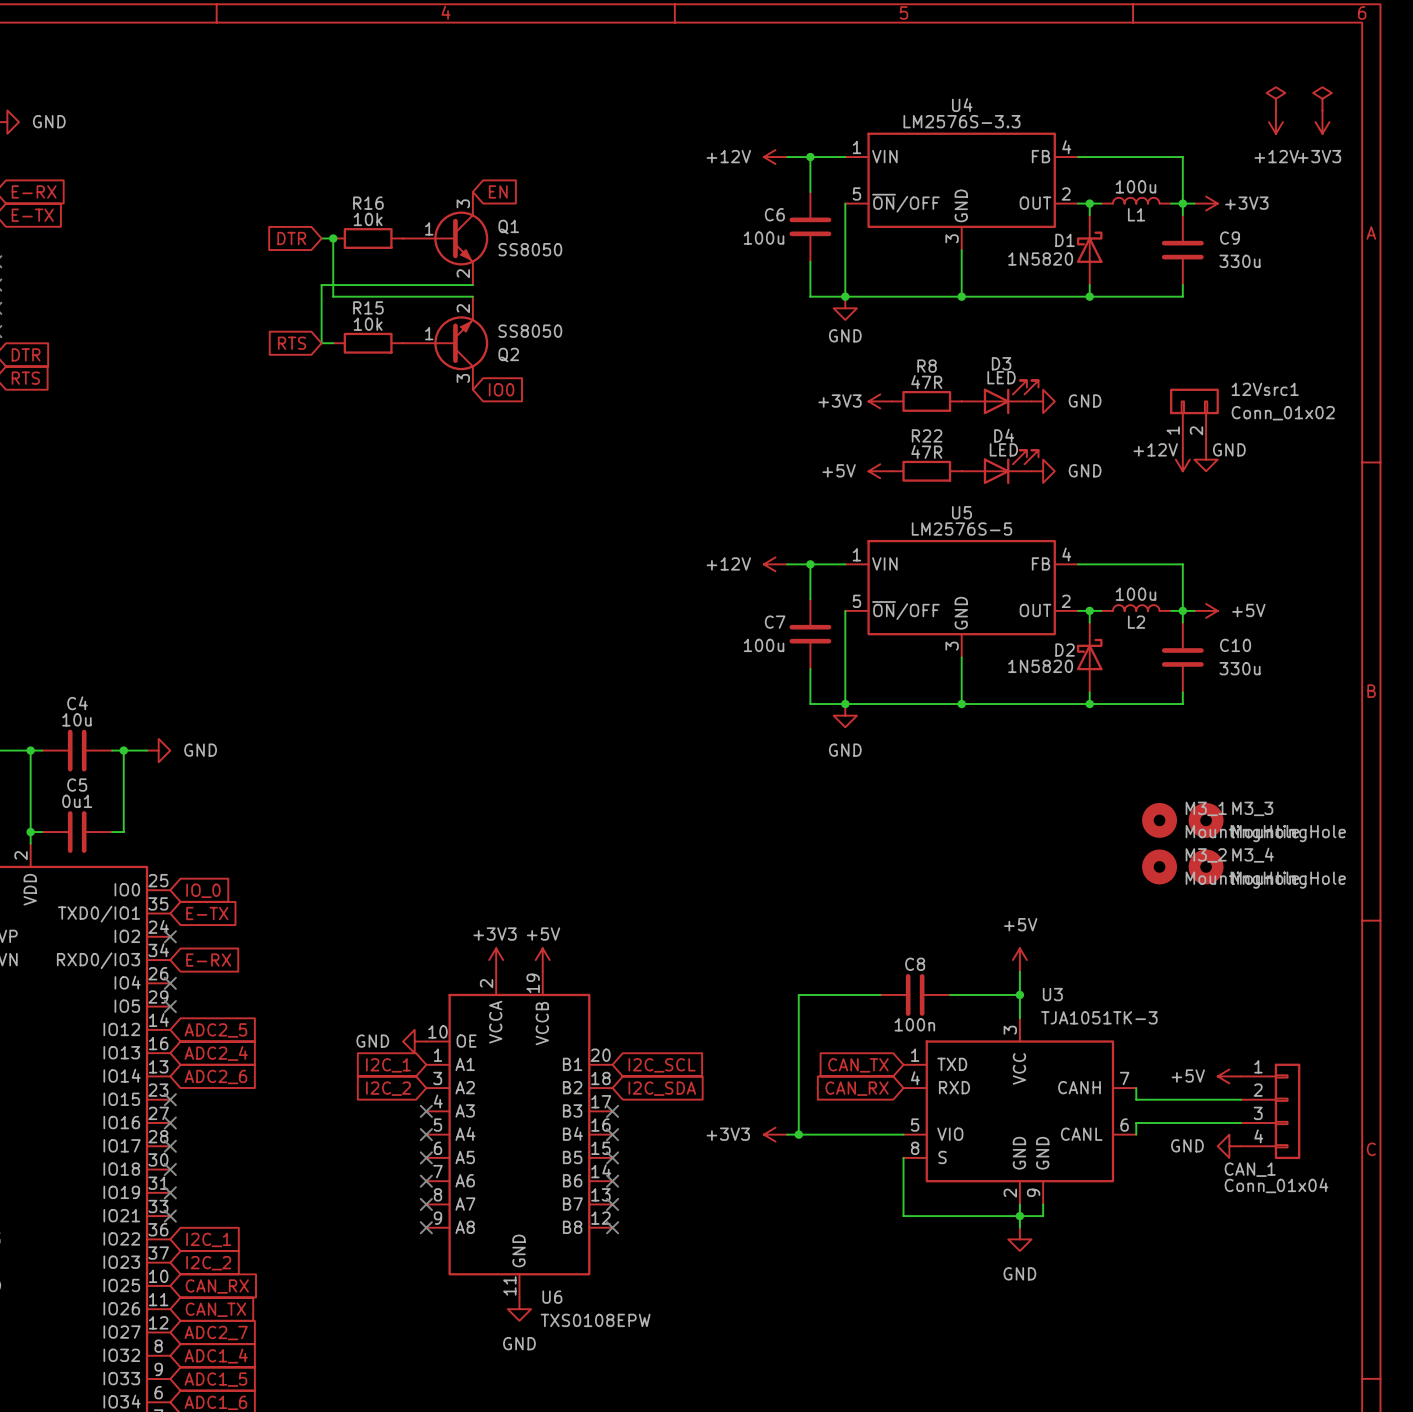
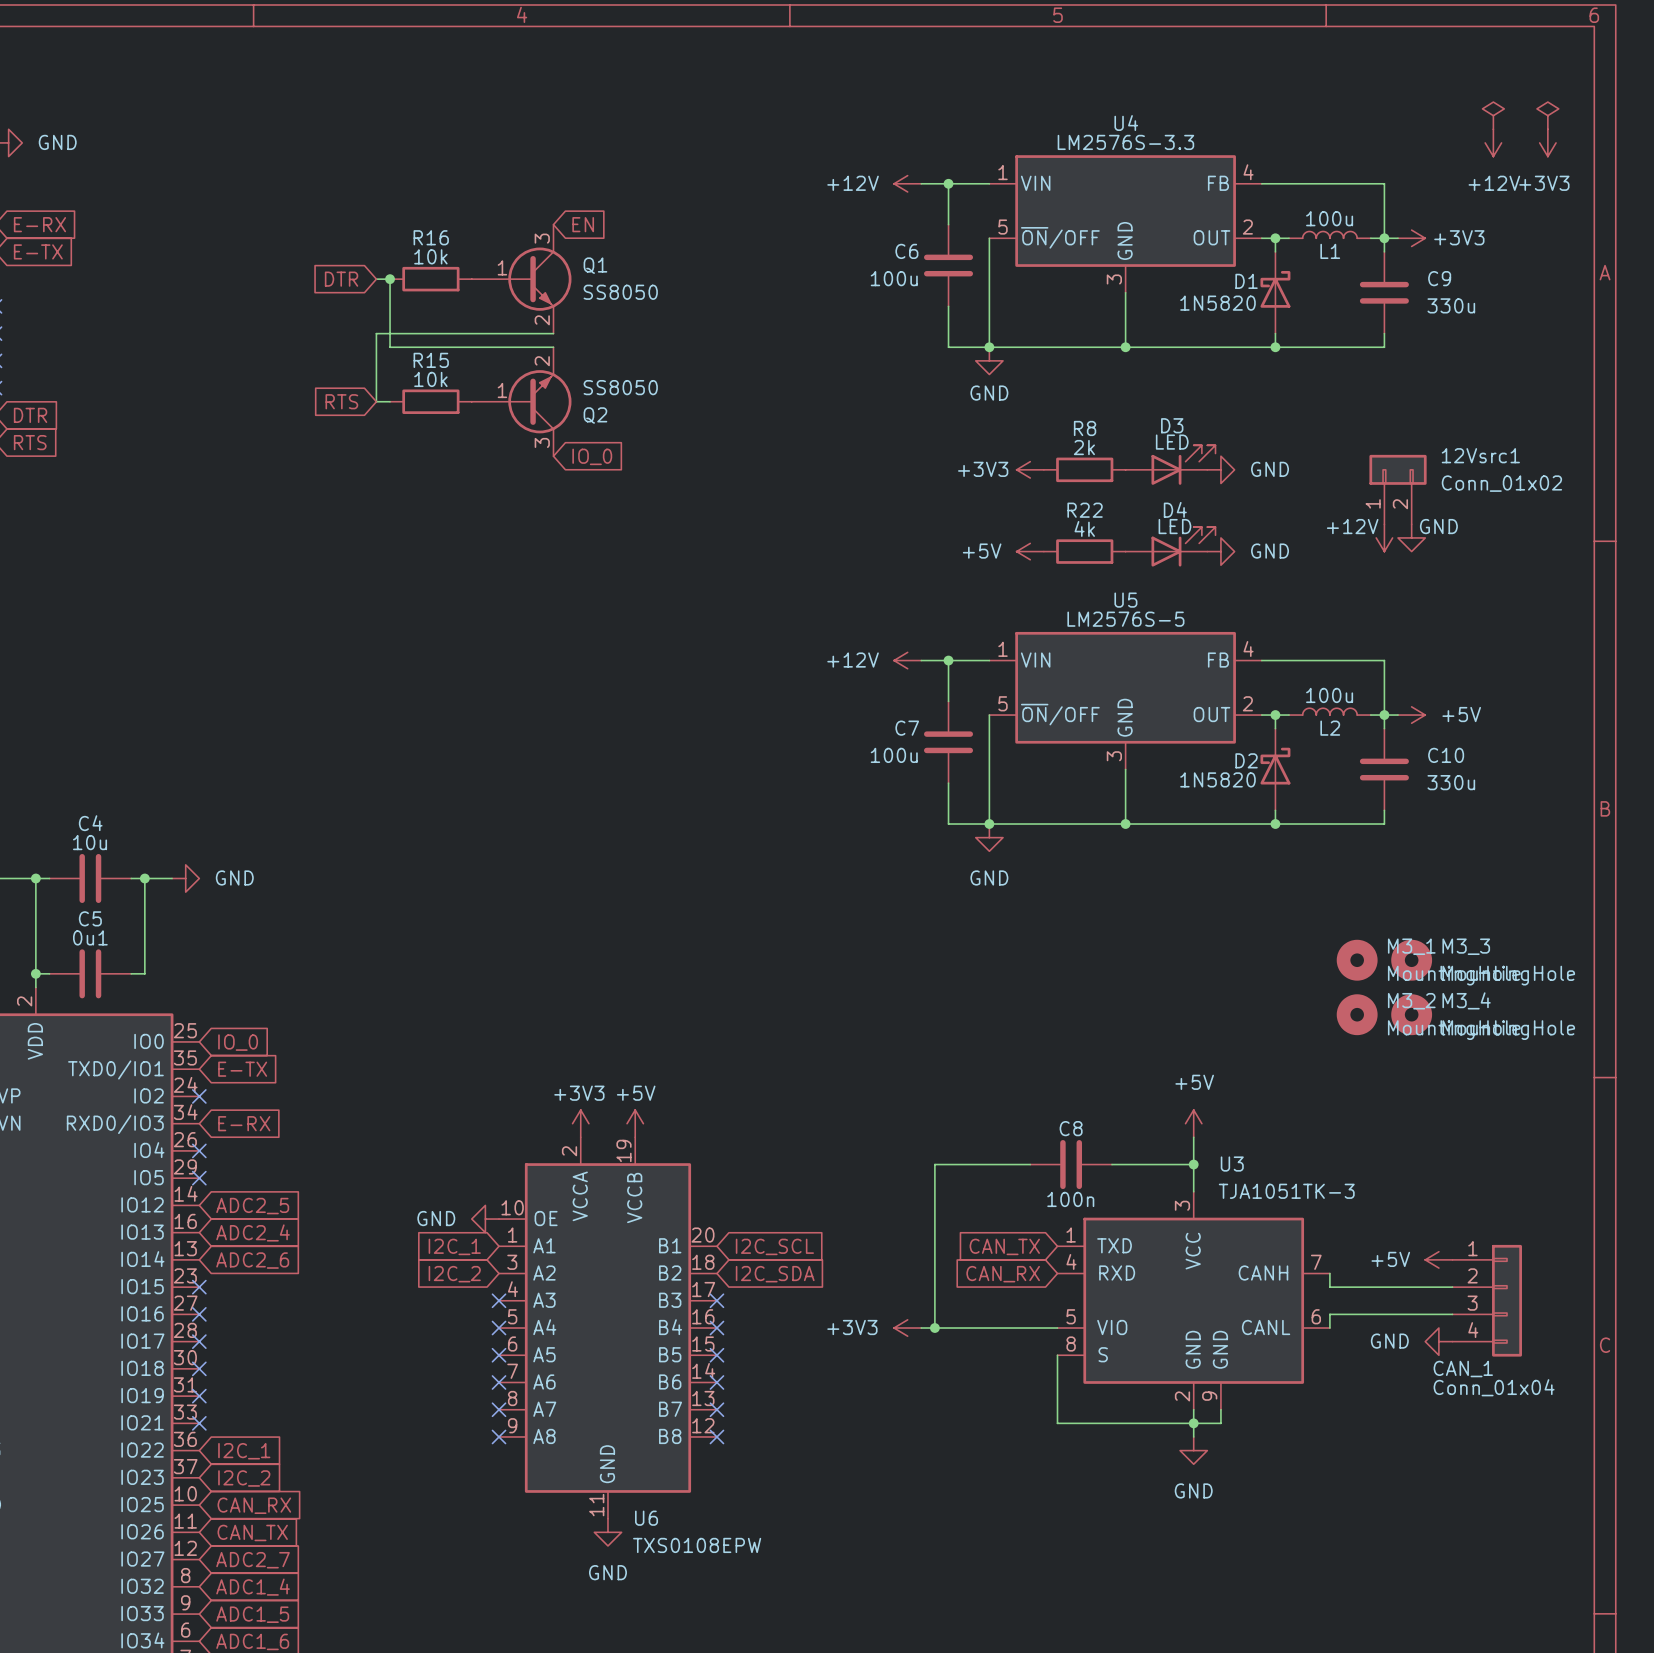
R8 value: 47R (926, 382) -> 2k (1084, 447)
global label: IO0 (501, 389) -> IO_0 (592, 456)
R22 value: 47R (926, 451) -> 4k (1084, 528)

